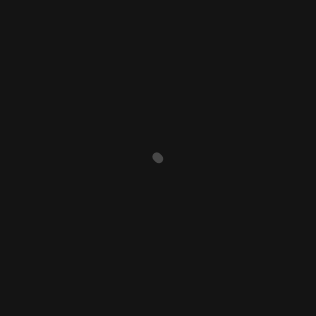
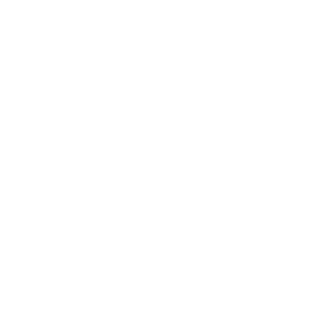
track: (156, 156) (158, 158) -> none

